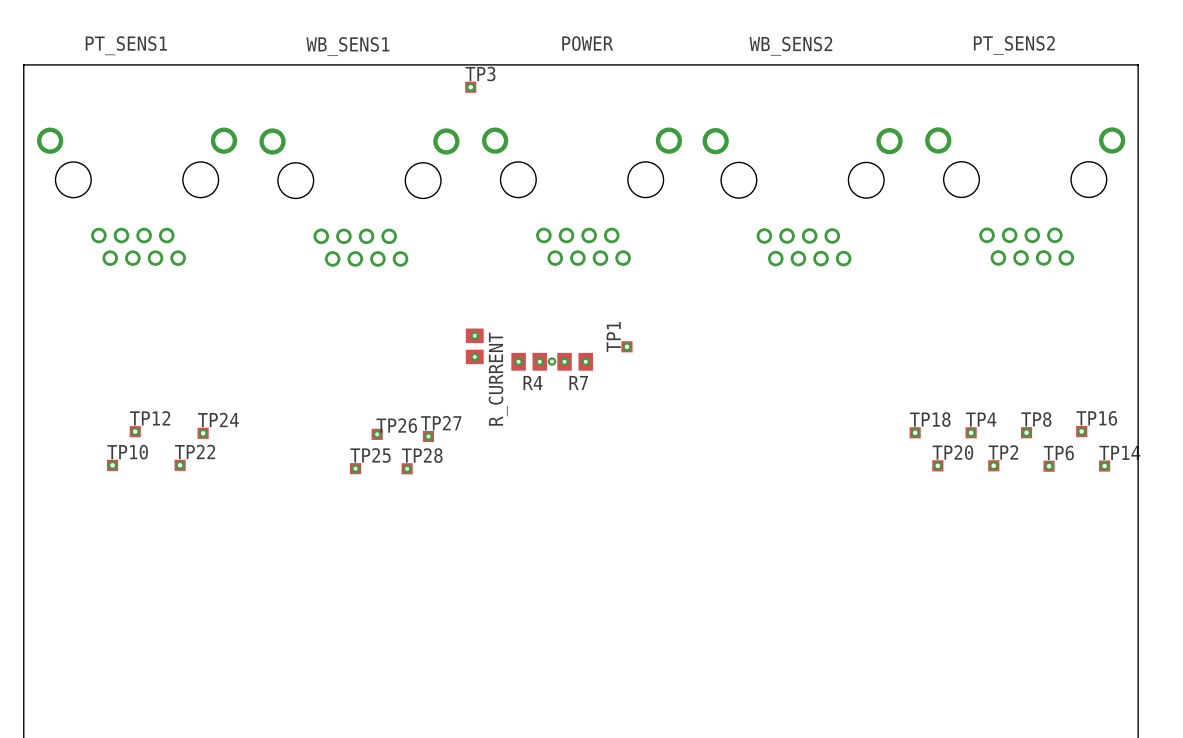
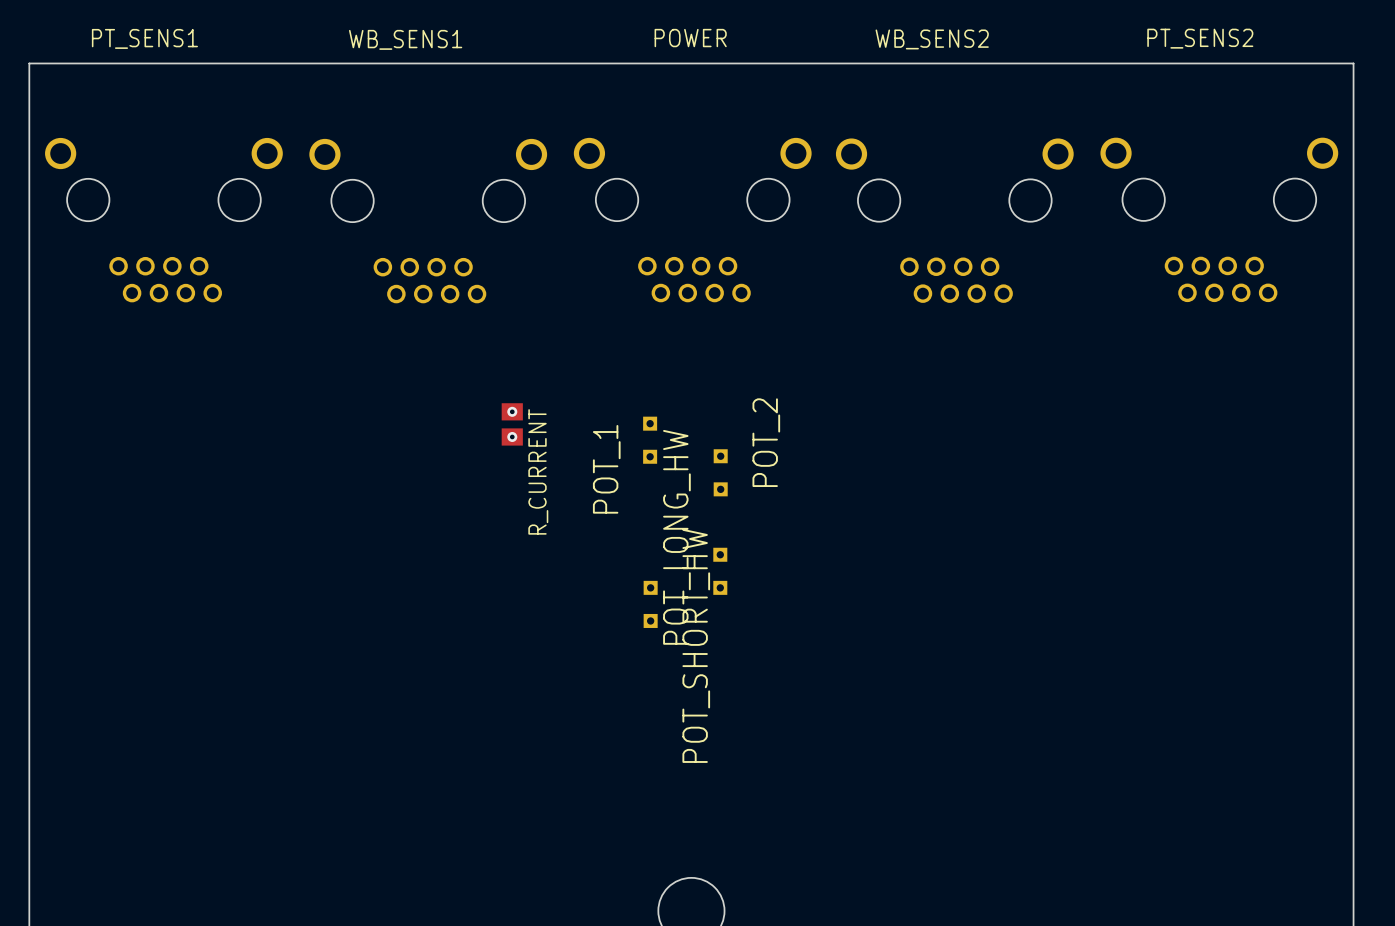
TP3: (470, 87) -> none
via: (470, 87) -> none
via: (474, 335) -> none
R_CURRENT position: (474, 346) -> (512, 424)
TP1: (626, 346) -> none
via: (626, 346) -> none
via: (474, 356) -> none
via: none -> (512, 411)
via: (518, 361) -> none
R4: (529, 361) -> none
via: (539, 361) -> none
via: (551, 361) -> none
via: (564, 361) -> none
R7: (575, 361) -> none
via: (585, 361) -> none
via: none -> (512, 436)
POT_1: none -> (650, 440)
POT_2: none -> (720, 472)
TP12: (135, 431) -> none
via: (135, 431) -> none
TP16: (1081, 431) -> none
via: (1081, 431) -> none
TP18: (915, 432) -> none
via: (915, 432) -> none
TP4: (971, 432) -> none
via: (971, 432) -> none
TP8: (1026, 432) -> none
via: (1026, 432) -> none
TP24: (203, 433) -> none
via: (203, 433) -> none
TP26: (377, 434) -> none
via: (377, 434) -> none
TP27: (428, 436) -> none
via: (428, 436) -> none
TP10: (112, 465) -> none
via: (112, 465) -> none
TP22: (180, 465) -> none
via: (180, 465) -> none
TP20: (937, 465) -> none
via: (937, 465) -> none
TP2: (993, 465) -> none
via: (993, 465) -> none
TP6: (1049, 466) -> none
via: (1049, 466) -> none
TP14: (1104, 466) -> none
via: (1104, 466) -> none
TP25: (355, 468) -> none
via: (355, 468) -> none
TP28: (407, 468) -> none
via: (407, 468) -> none
POT_LONG_HW: none -> (720, 571)
POT_SHORT_HW: none -> (650, 604)

